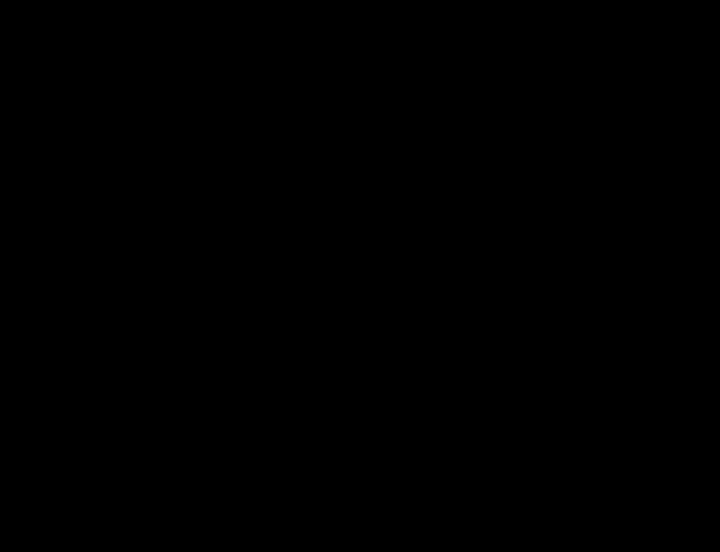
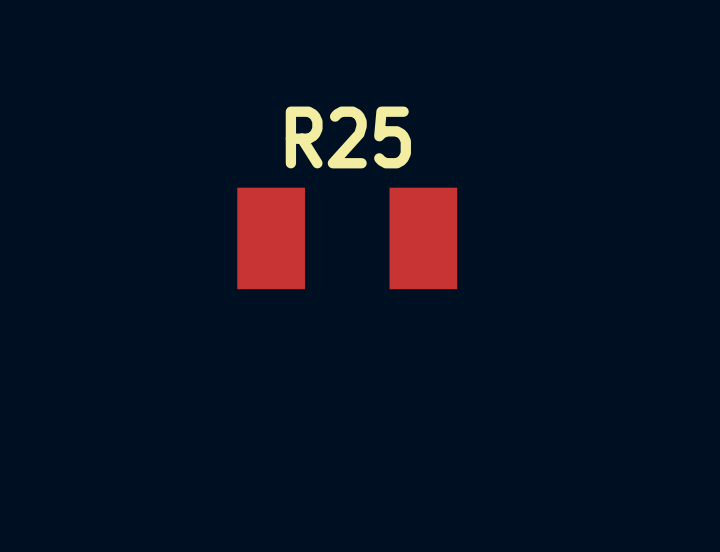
R25: none -> (347, 238)

